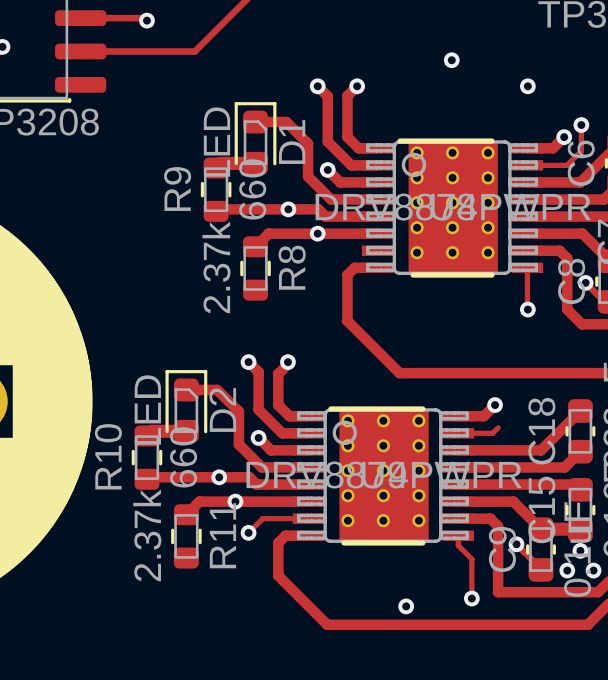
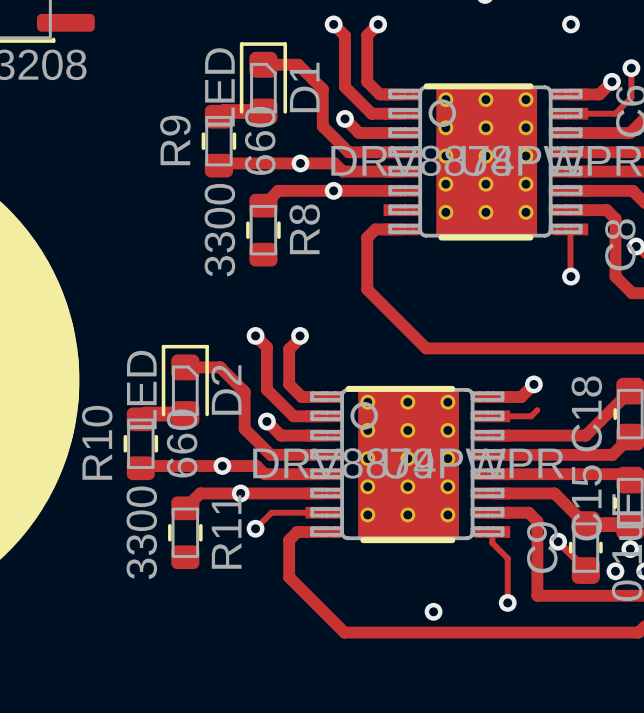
R8 value: 2.37k (216, 267) -> 3300 (219, 230)
R11 value: 2.37k (147, 535) -> 3300 (141, 532)

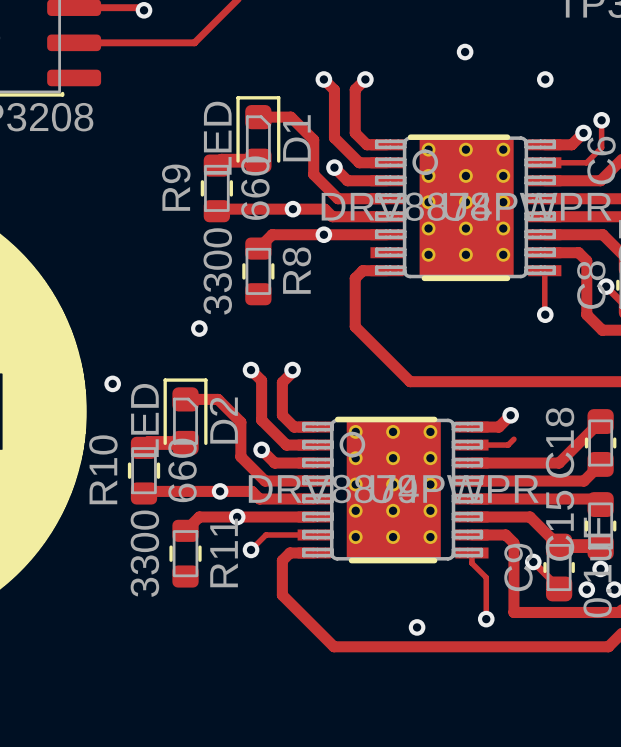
via: none -> (199, 328)
via: none -> (112, 383)

